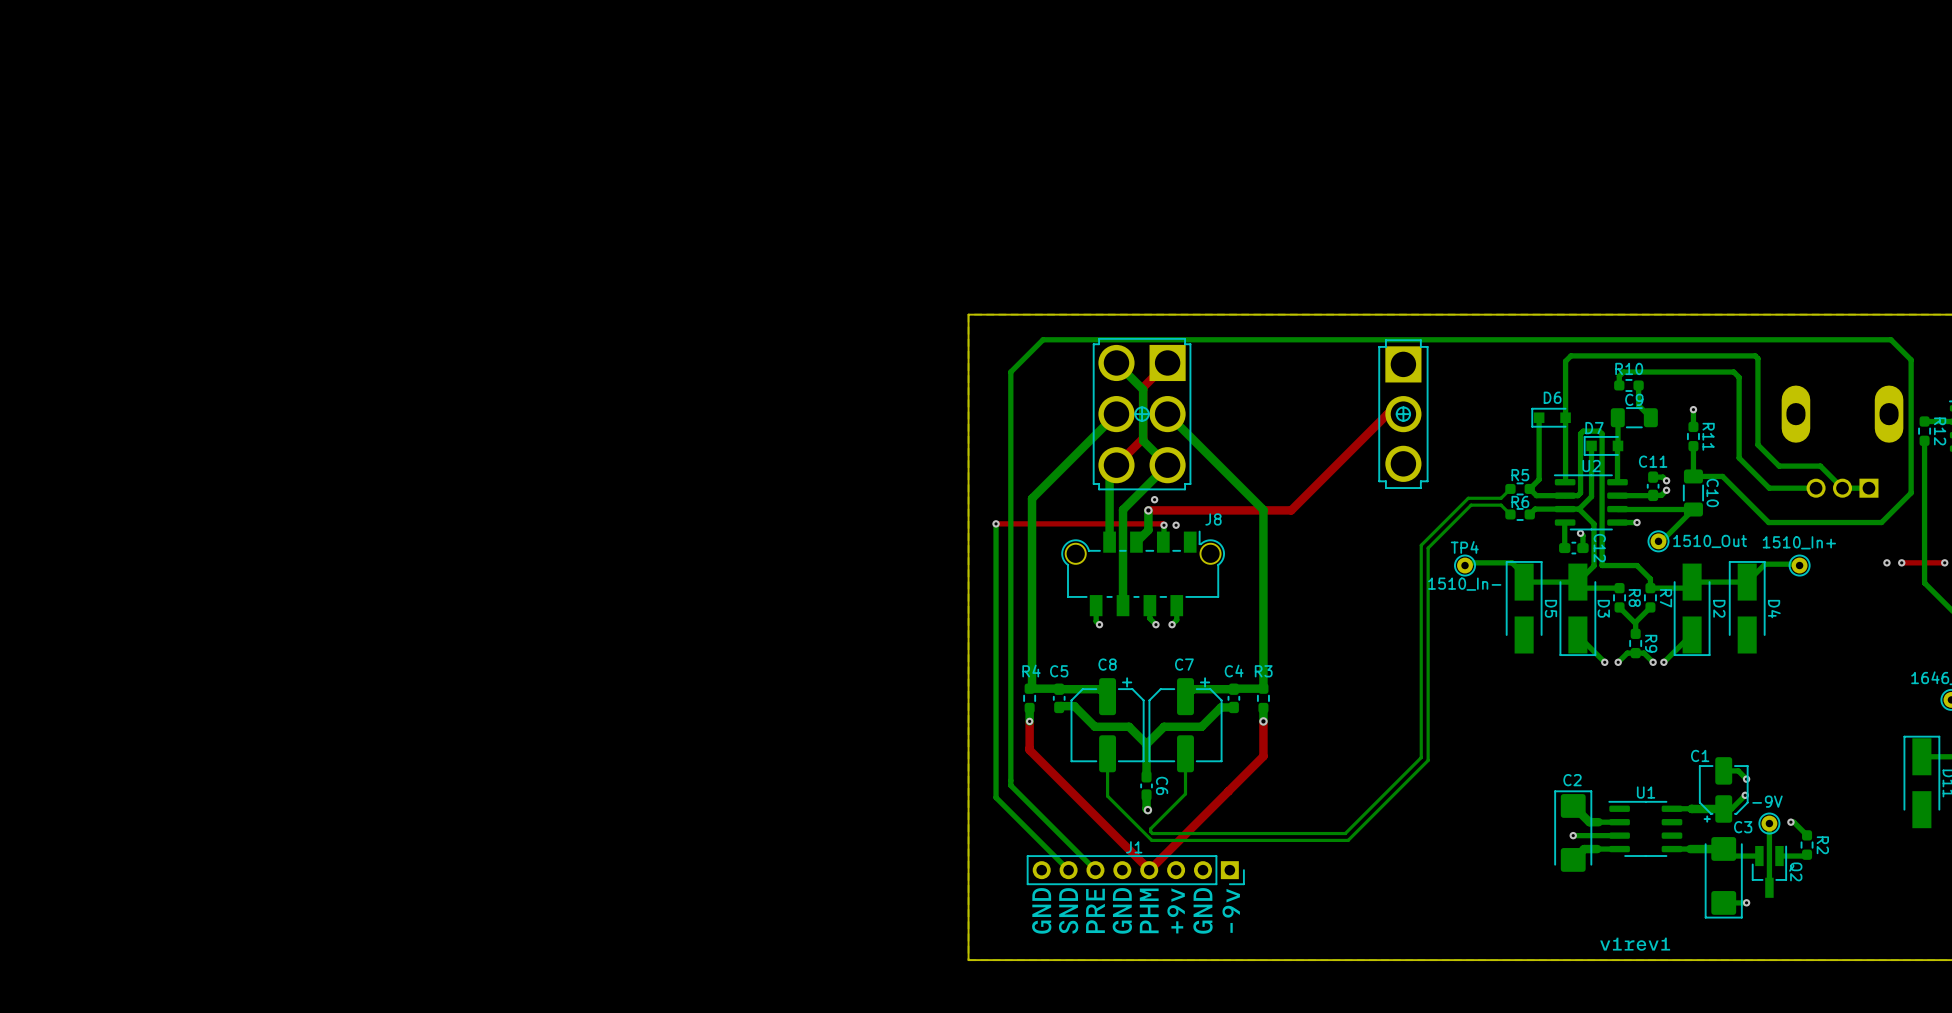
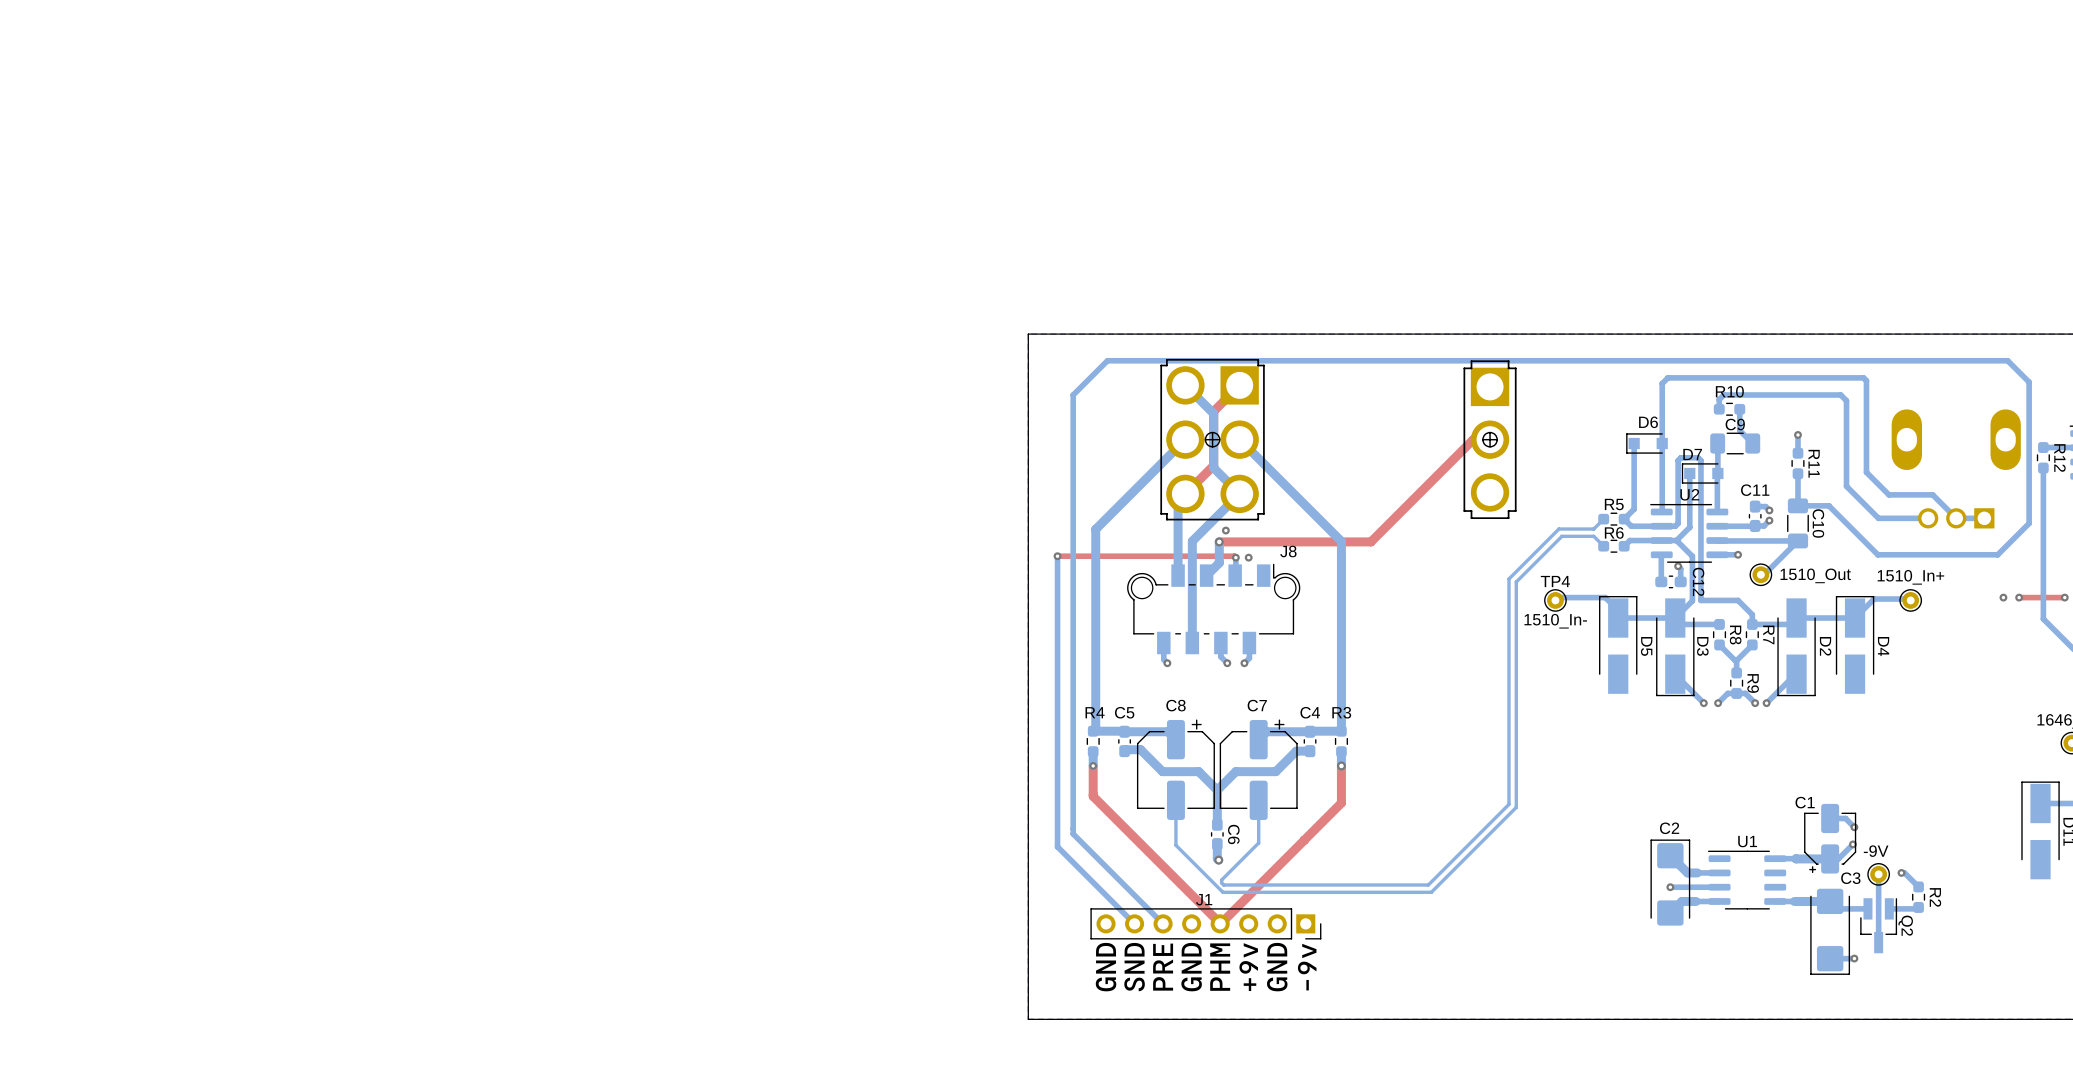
drawing: [1600, 937, 1671, 951] -> none

